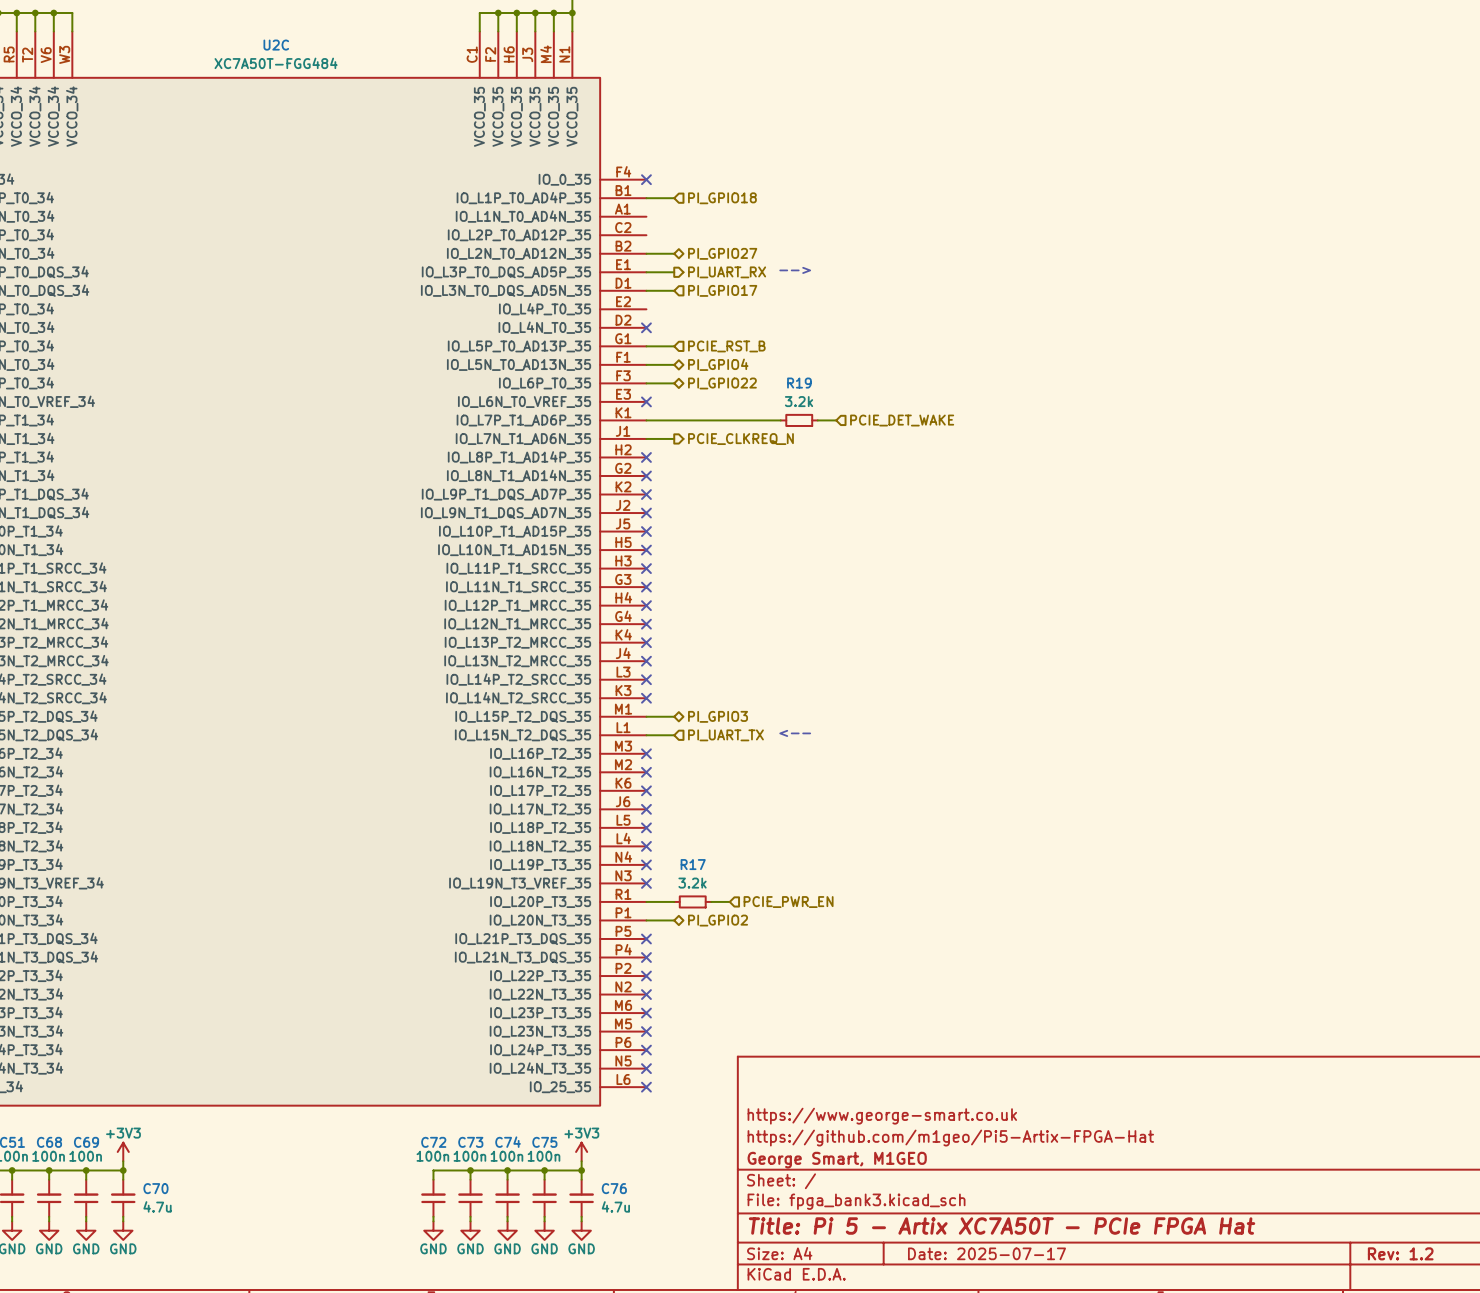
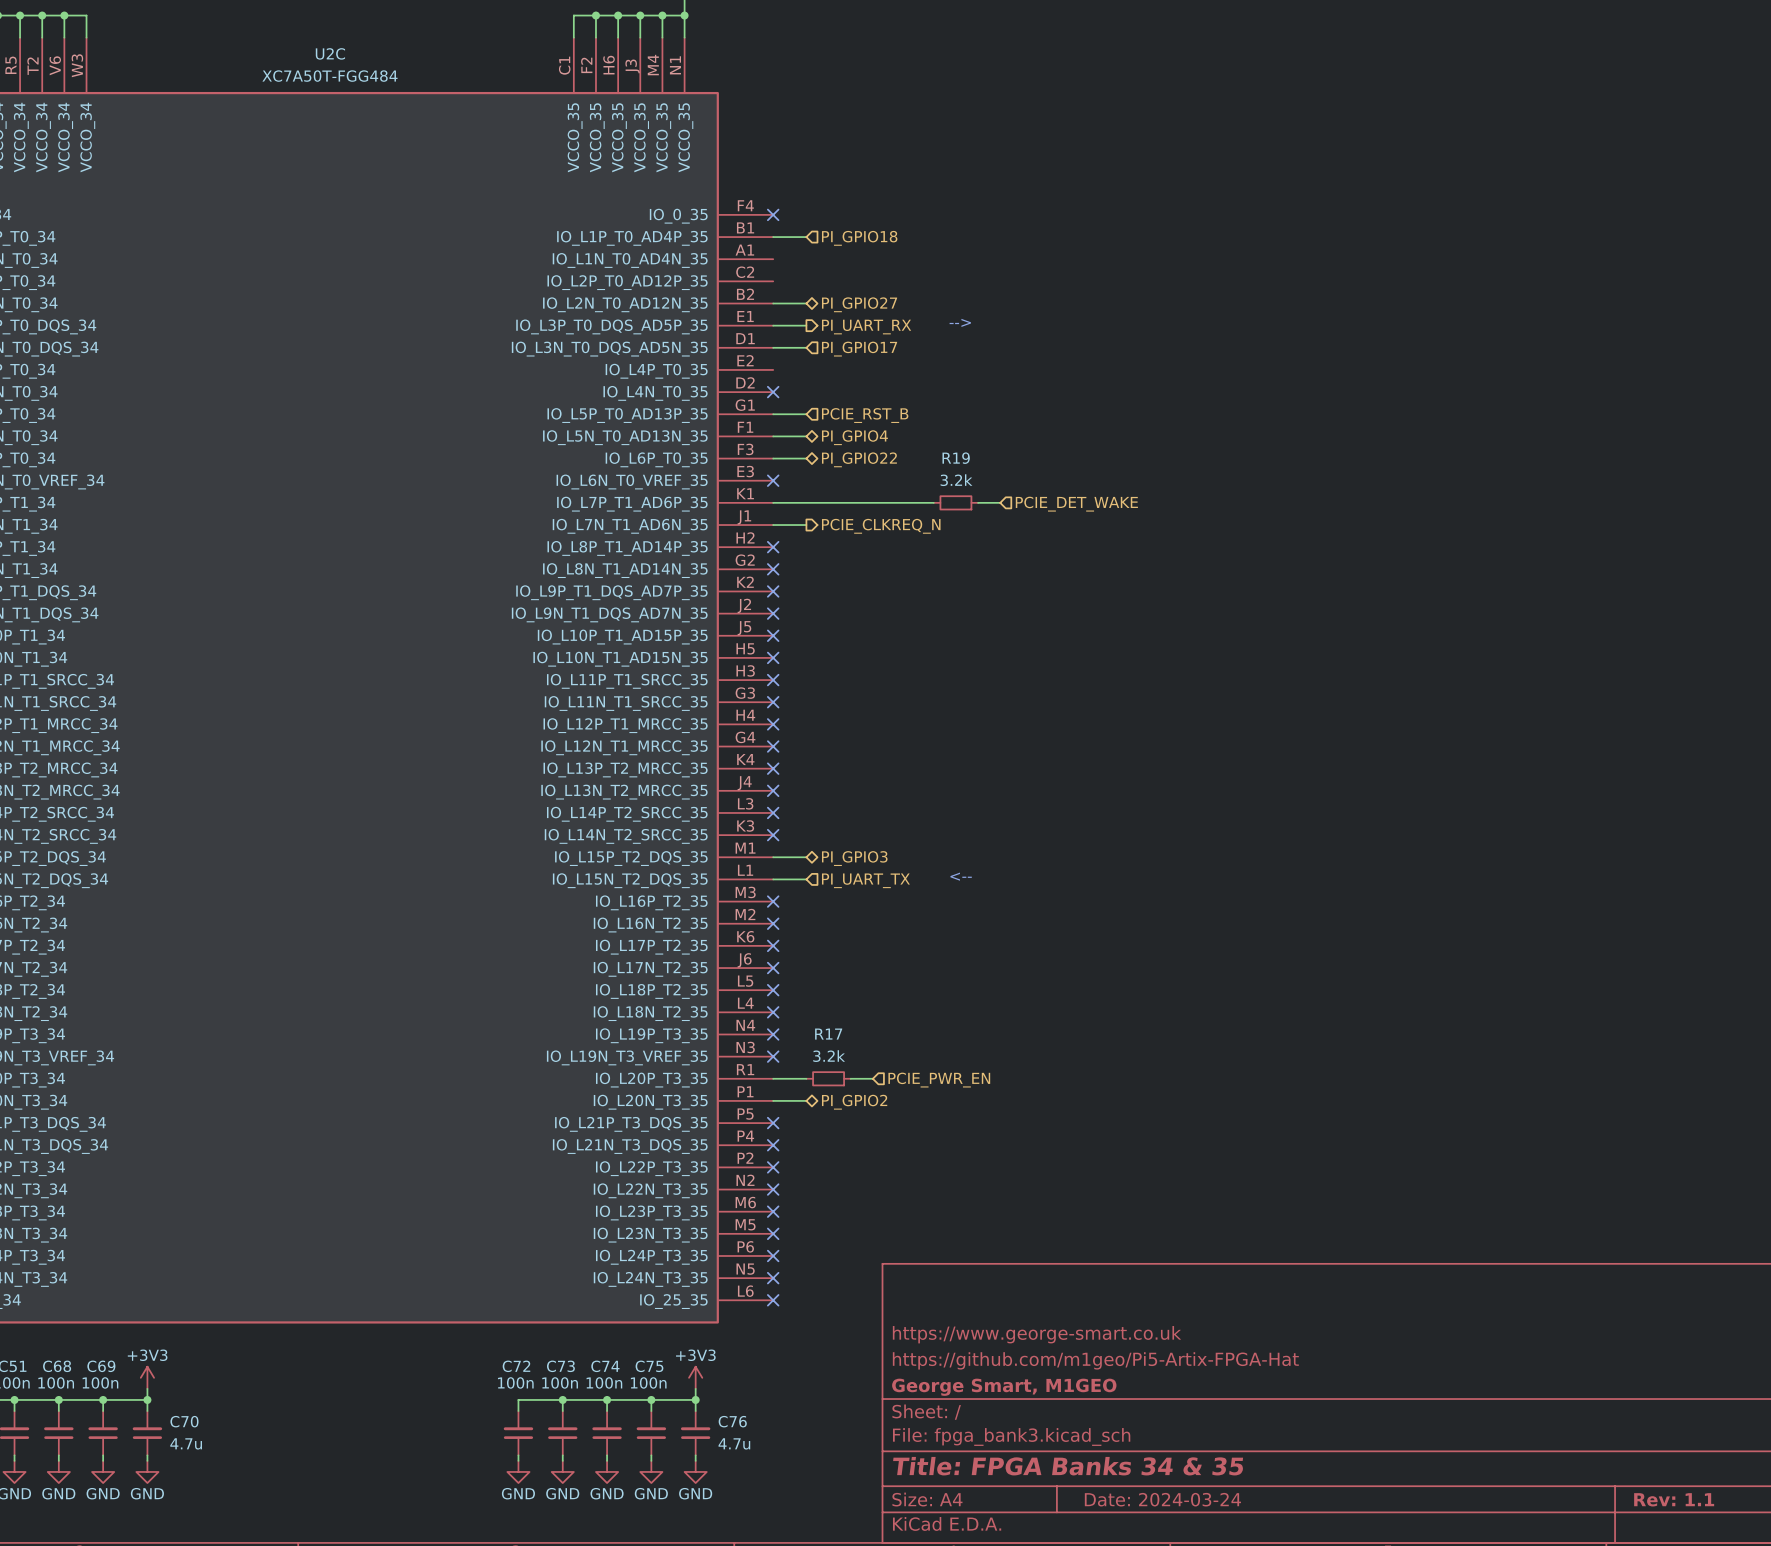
title block: Title: Pi 5 - Artix XC7A50T - PCIe FPGA Hat (1002, 1226) -> Title: FPGA Banks 34 & 35 (1068, 1466)
title block: Date: 2025-07-17 (986, 1253) -> Date: 2024-03-24 (1162, 1499)
title block: Rev: 1.2 (1400, 1253) -> Rev: 1.1 (1674, 1499)

